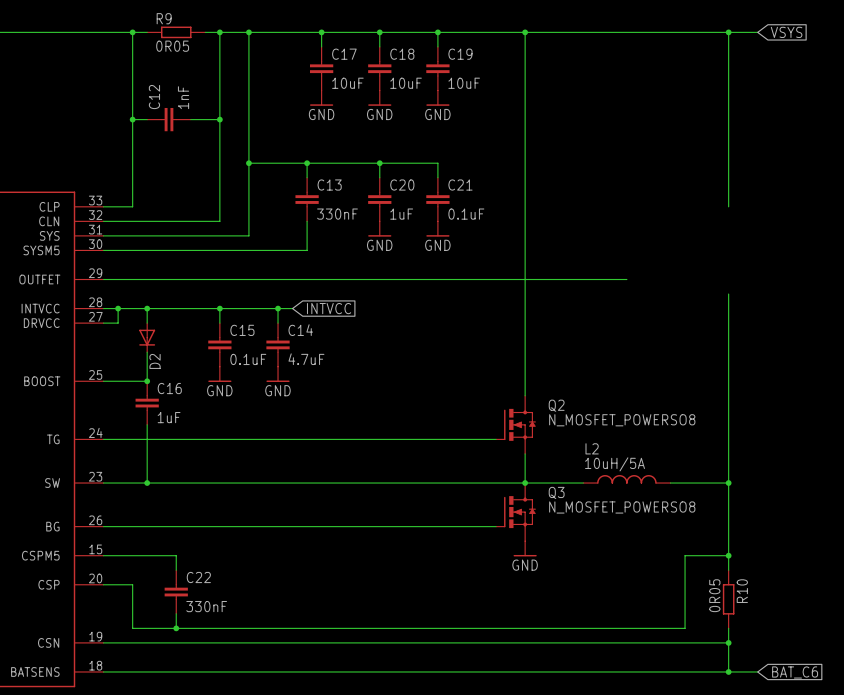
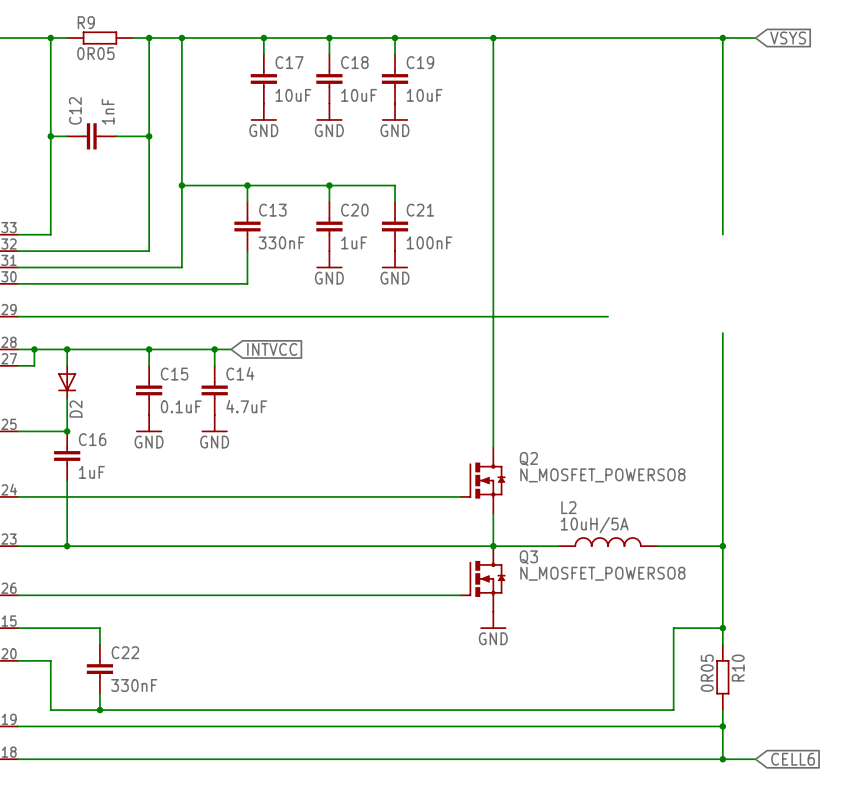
C21 value: 0.1uF (466, 214) -> 100nF (429, 242)
global label: BAT_C6 (795, 672) -> CELL6 (793, 759)

